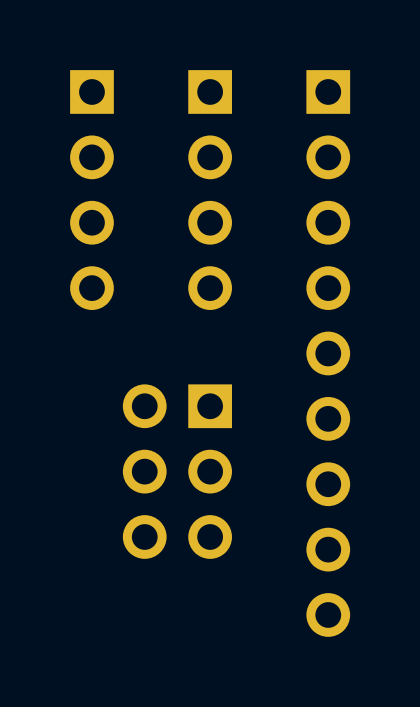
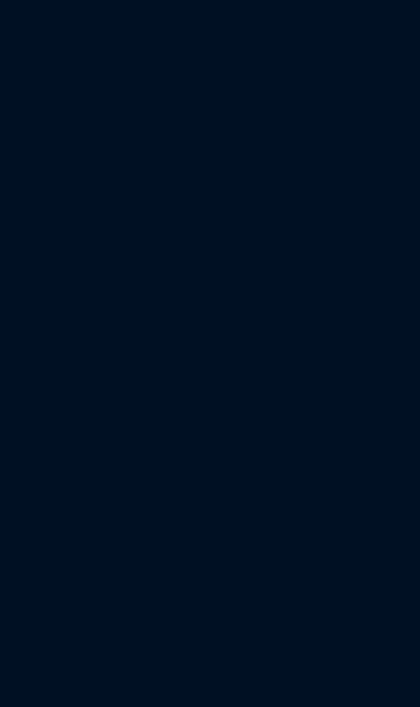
part: (91, 190) -> none
part: (210, 190) -> none
part: (328, 353) -> none
part: (177, 471) -> none

